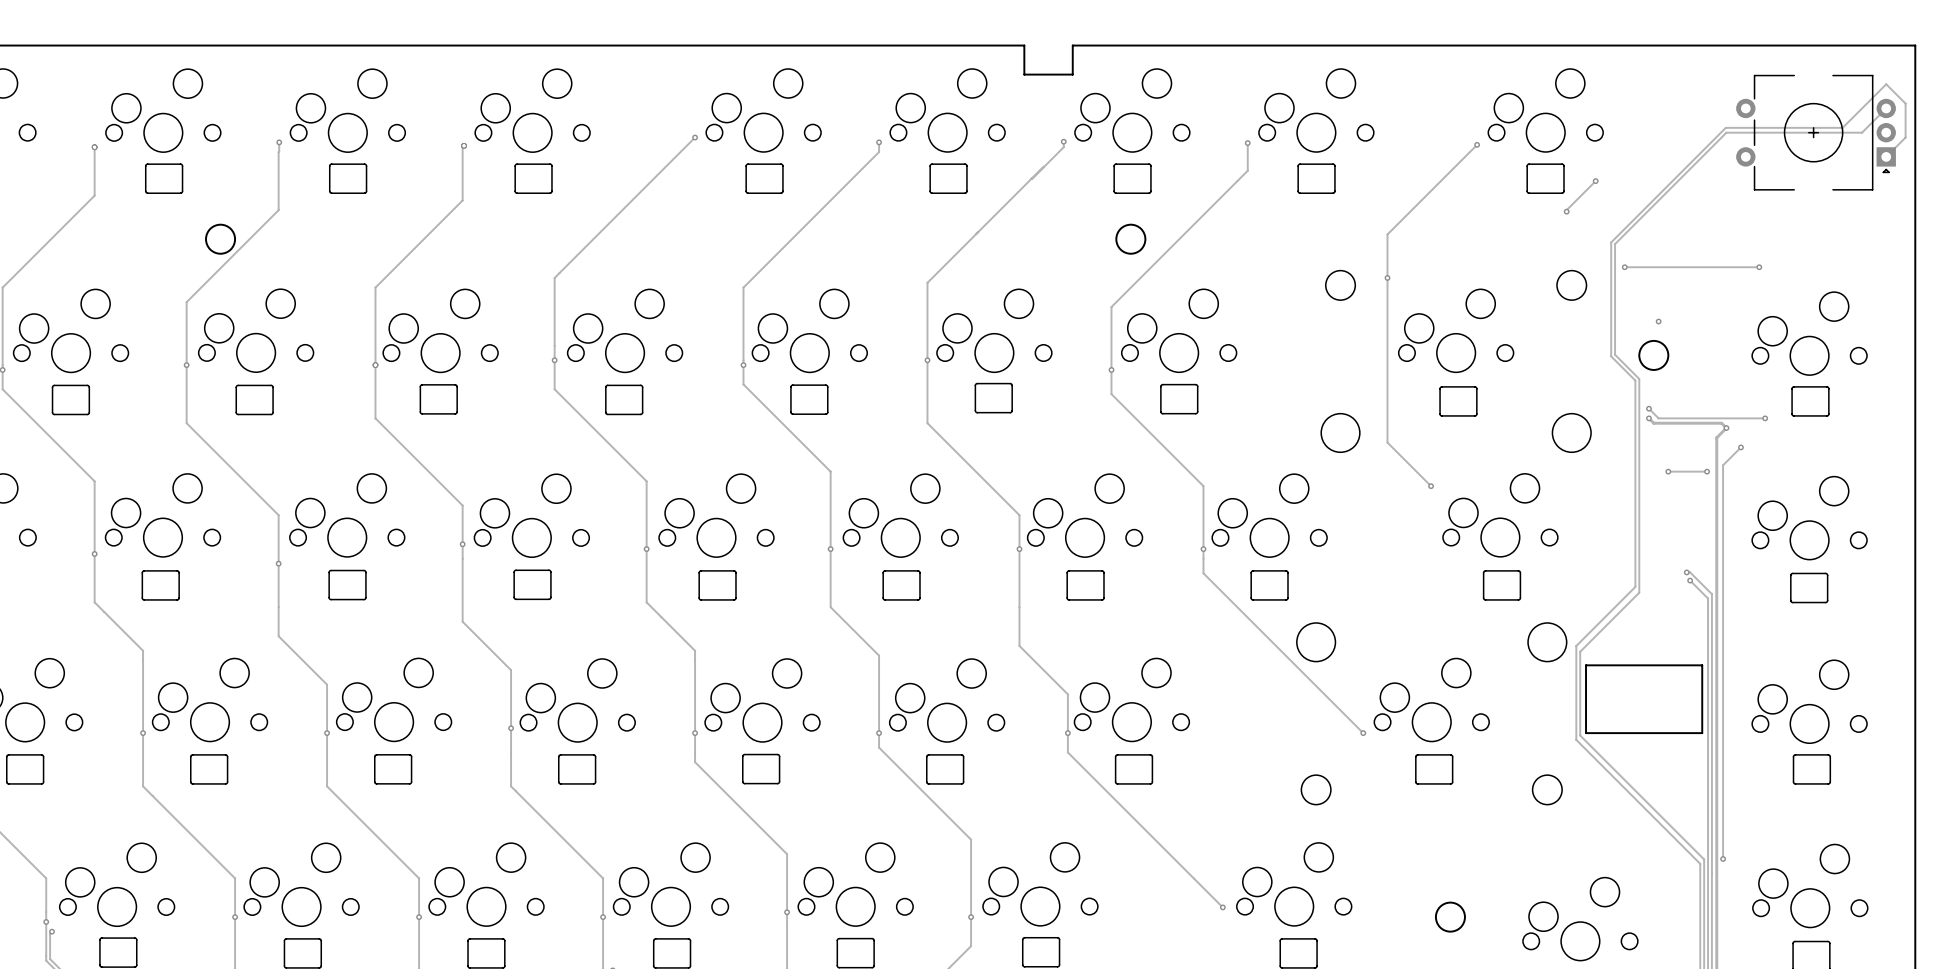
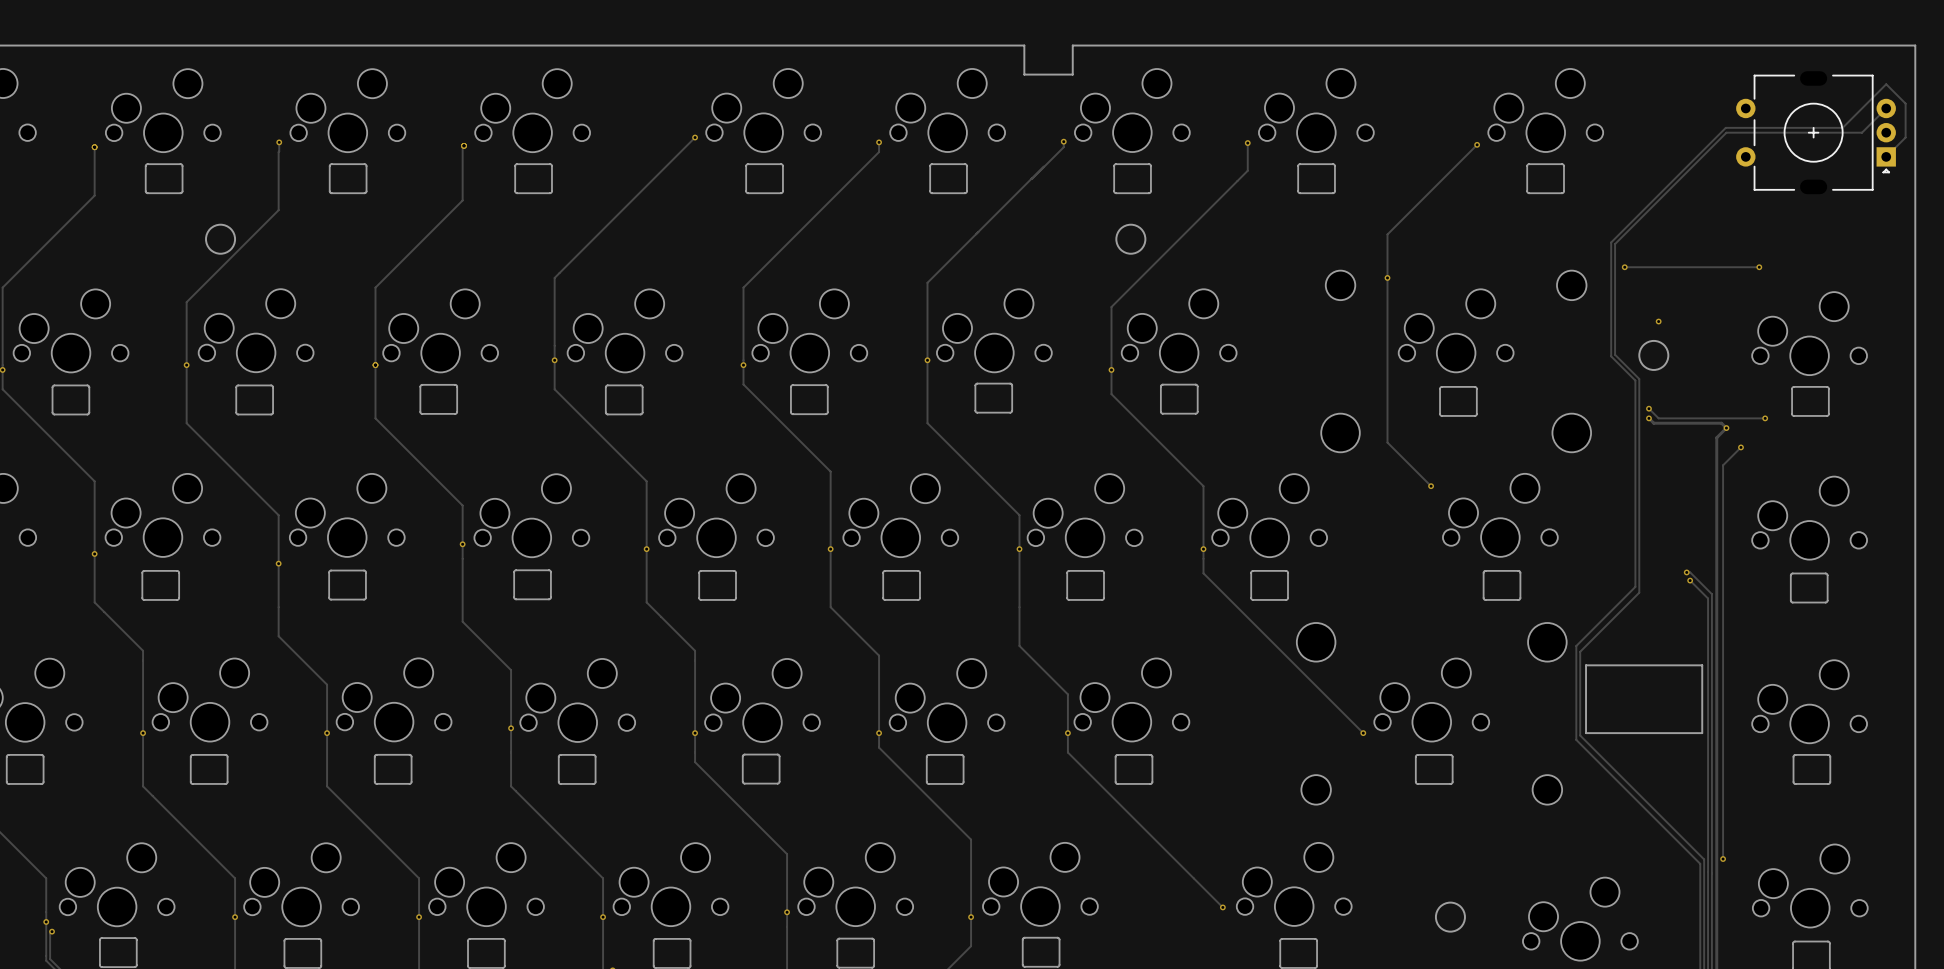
track: (1595, 181) (1566, 211) -> none
via: (1595, 181) -> none
via: (1566, 211) -> none
track: (1668, 471) (1707, 471) -> none
via: (1668, 471) -> none
via: (1707, 471) -> none

